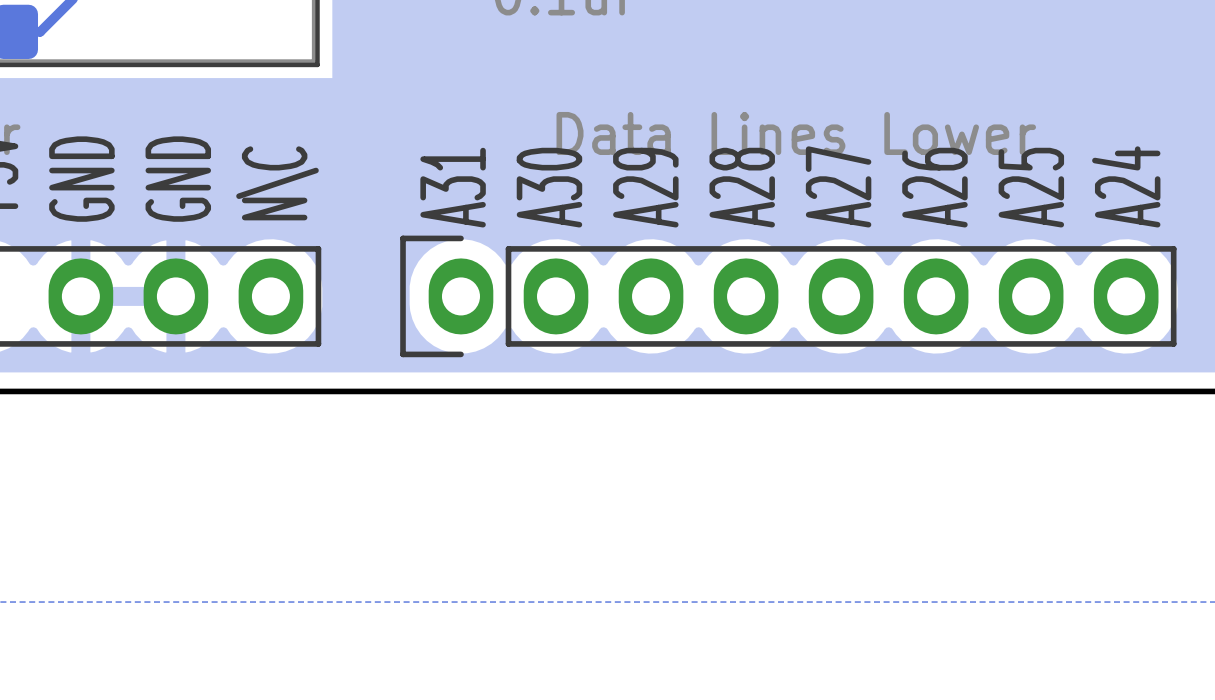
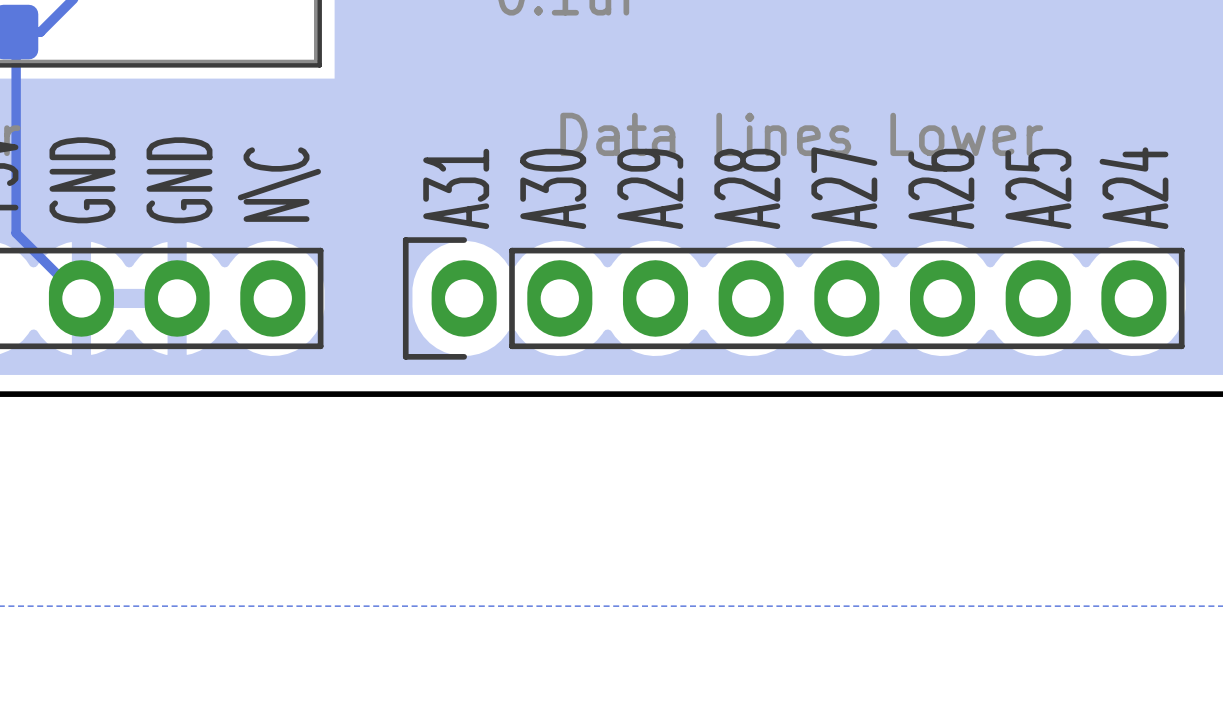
bottom track: none -> (16, 32) (16, 233) (81, 298)

